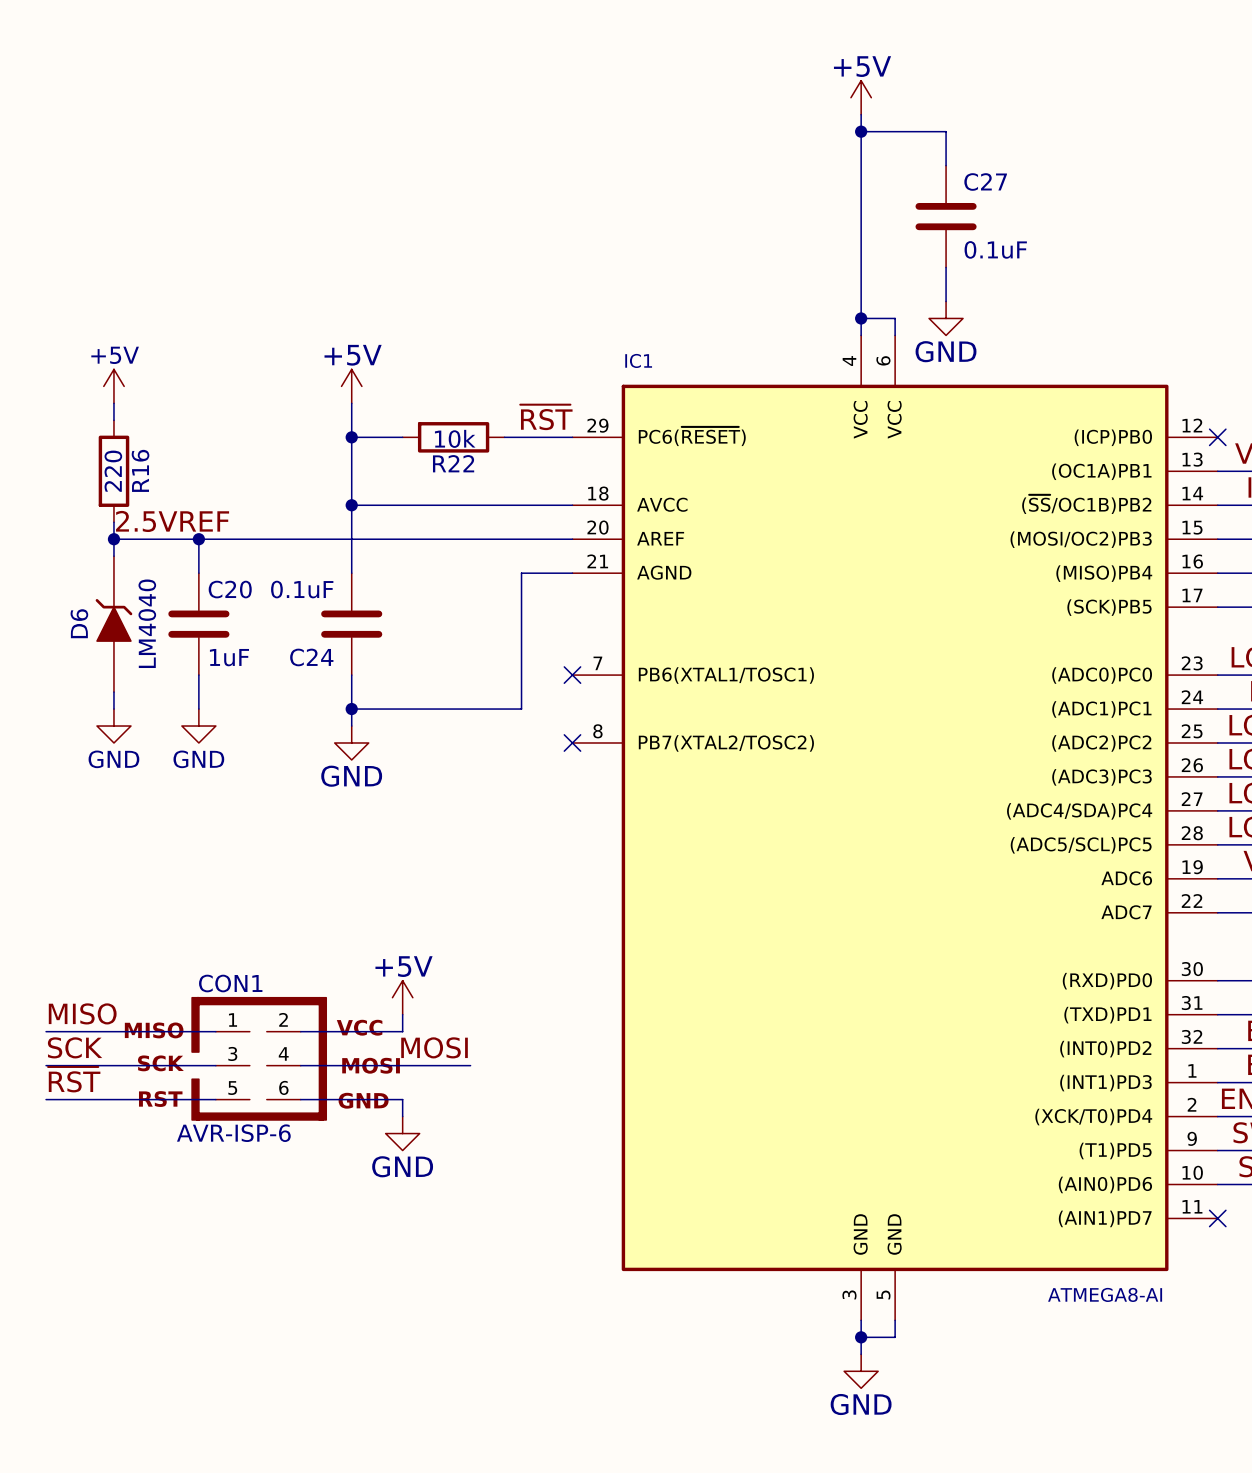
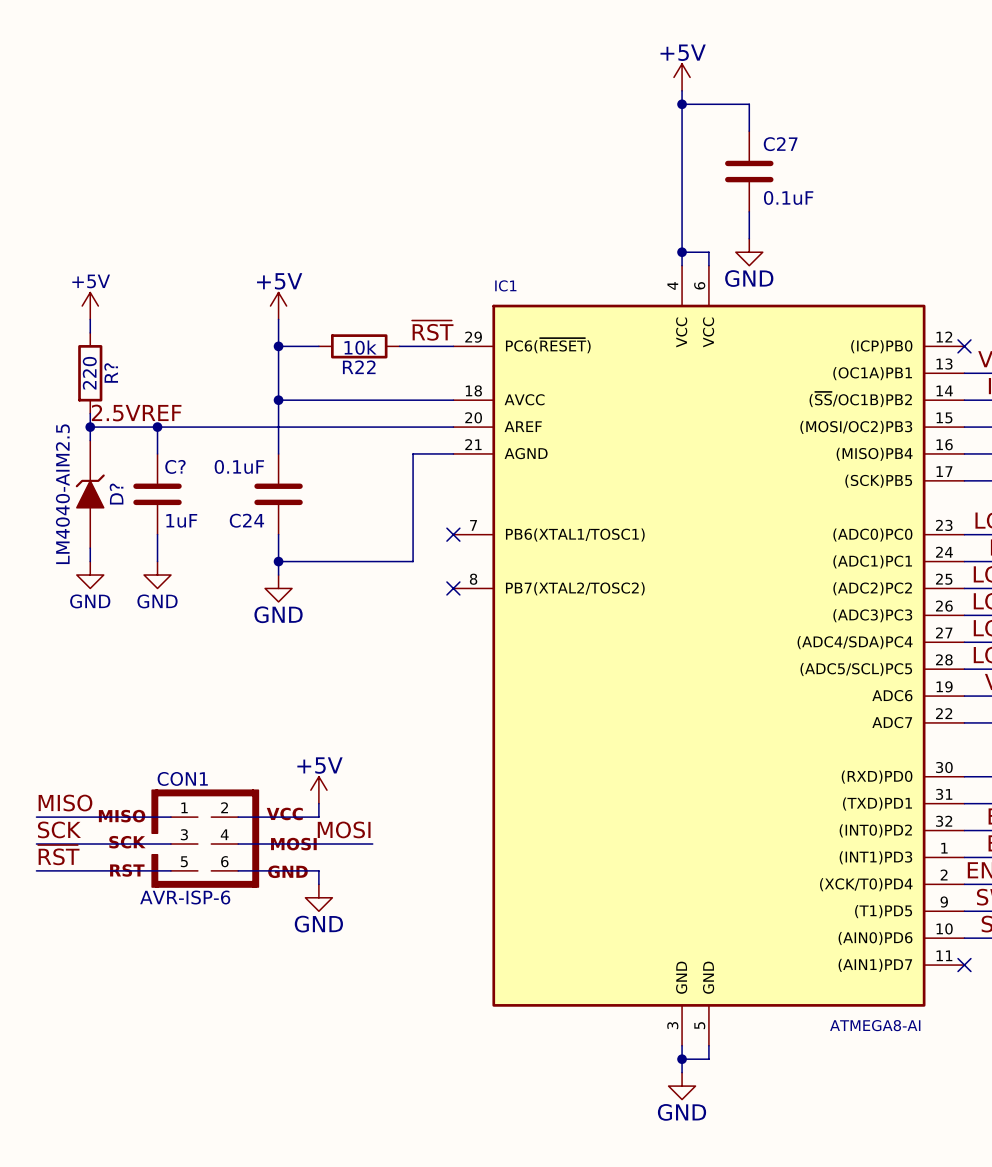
R16 name: R16 (140, 470) -> R? (111, 373)
C20 name: C20 (230, 589) -> C? (175, 466)
D6: LM4040 (113, 624) -> none
D?: none -> LM4040-AIM2.5 (90, 494)

